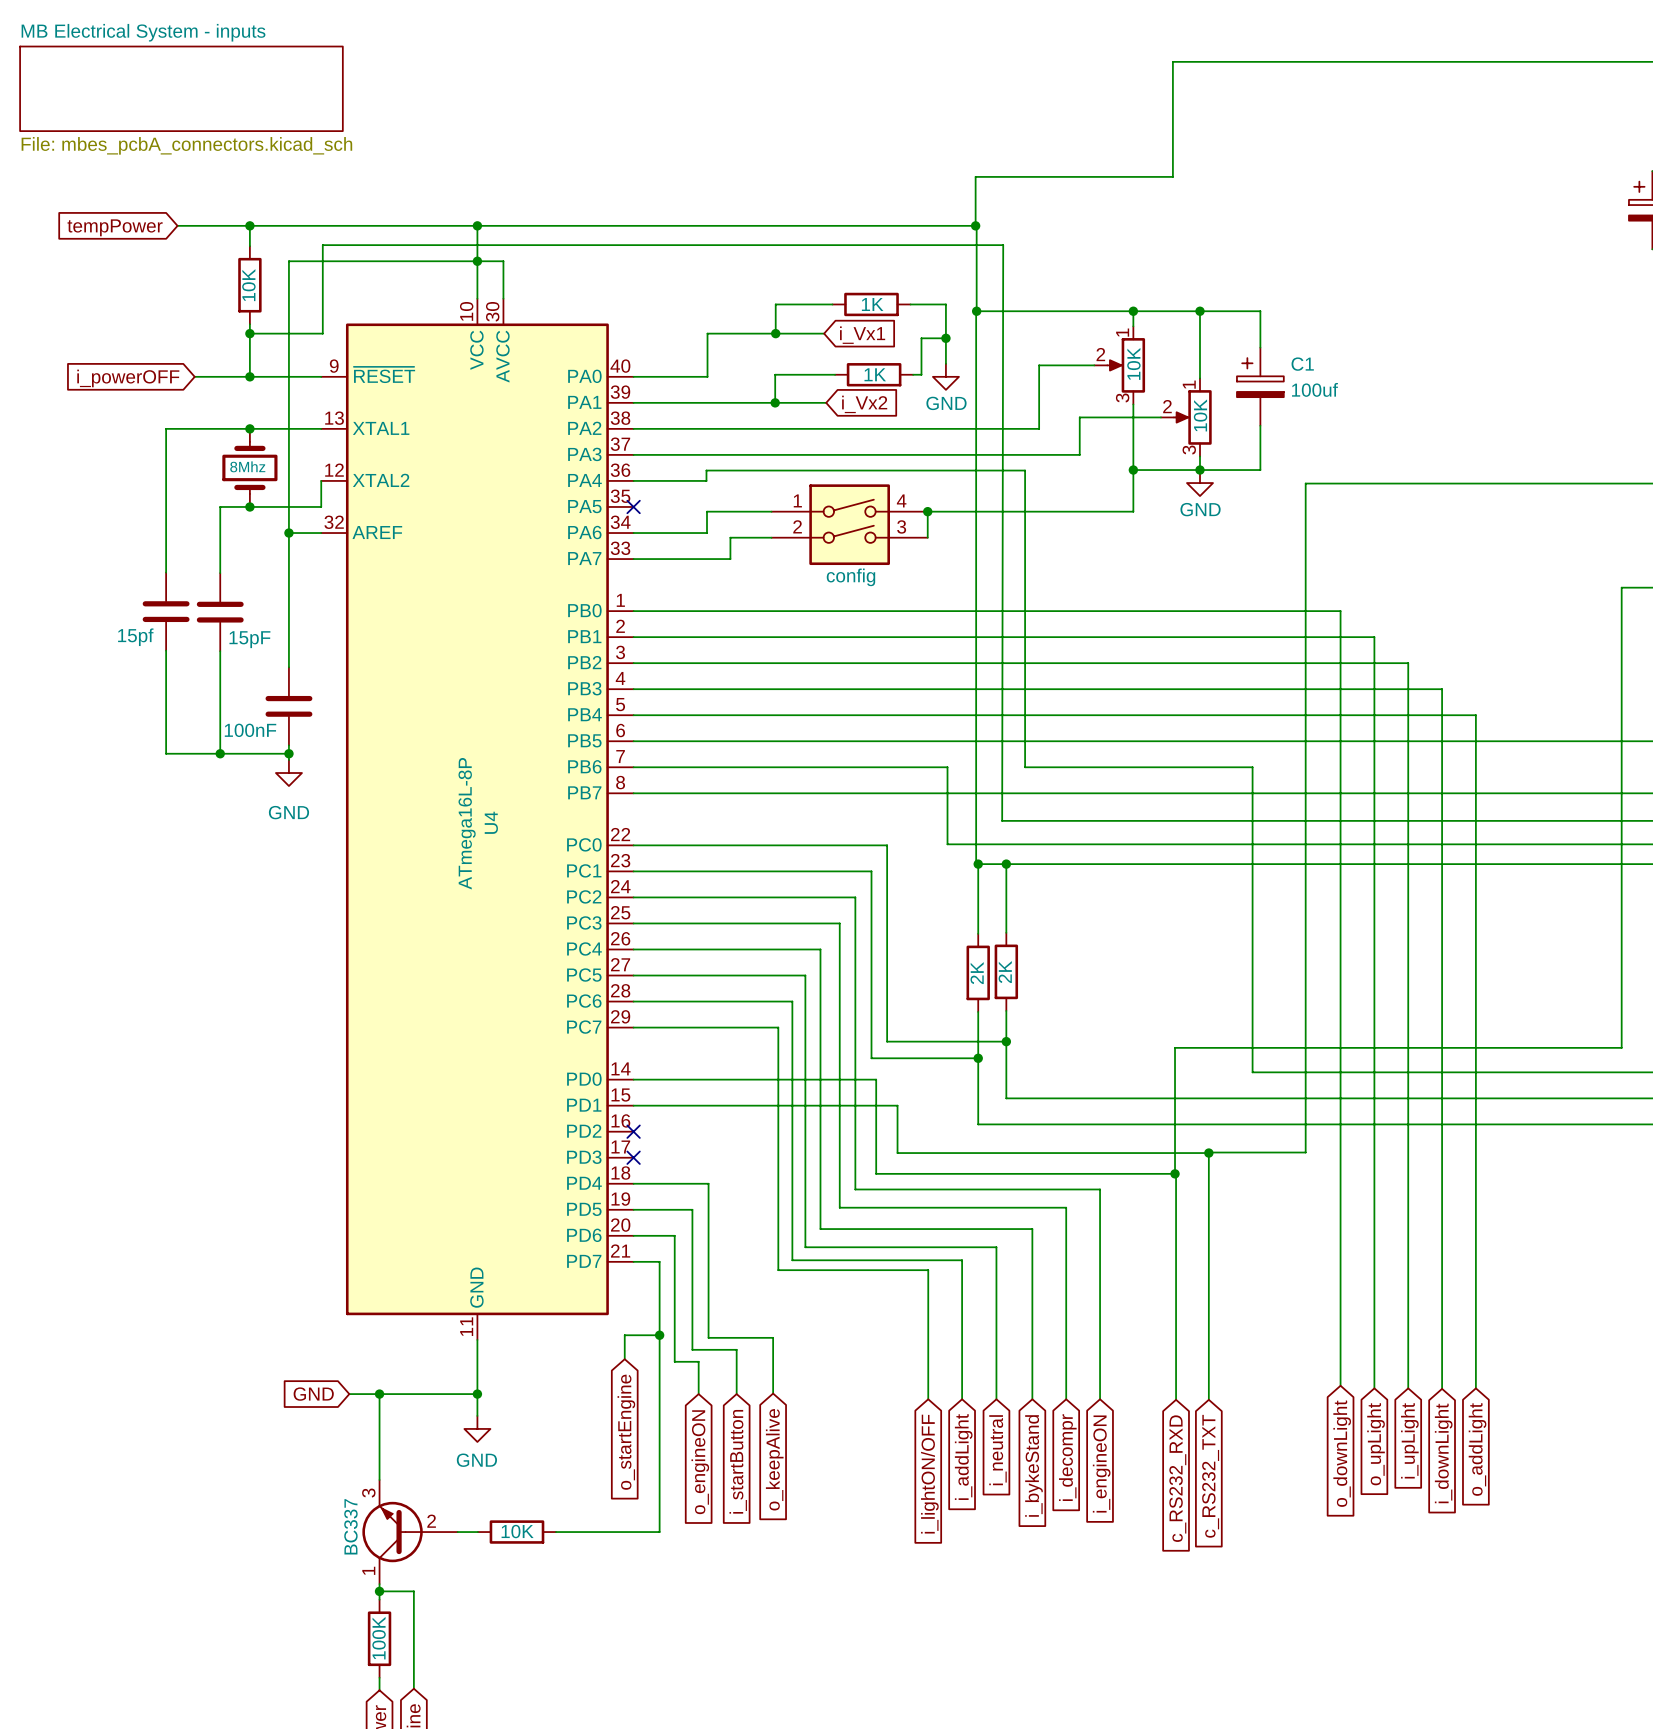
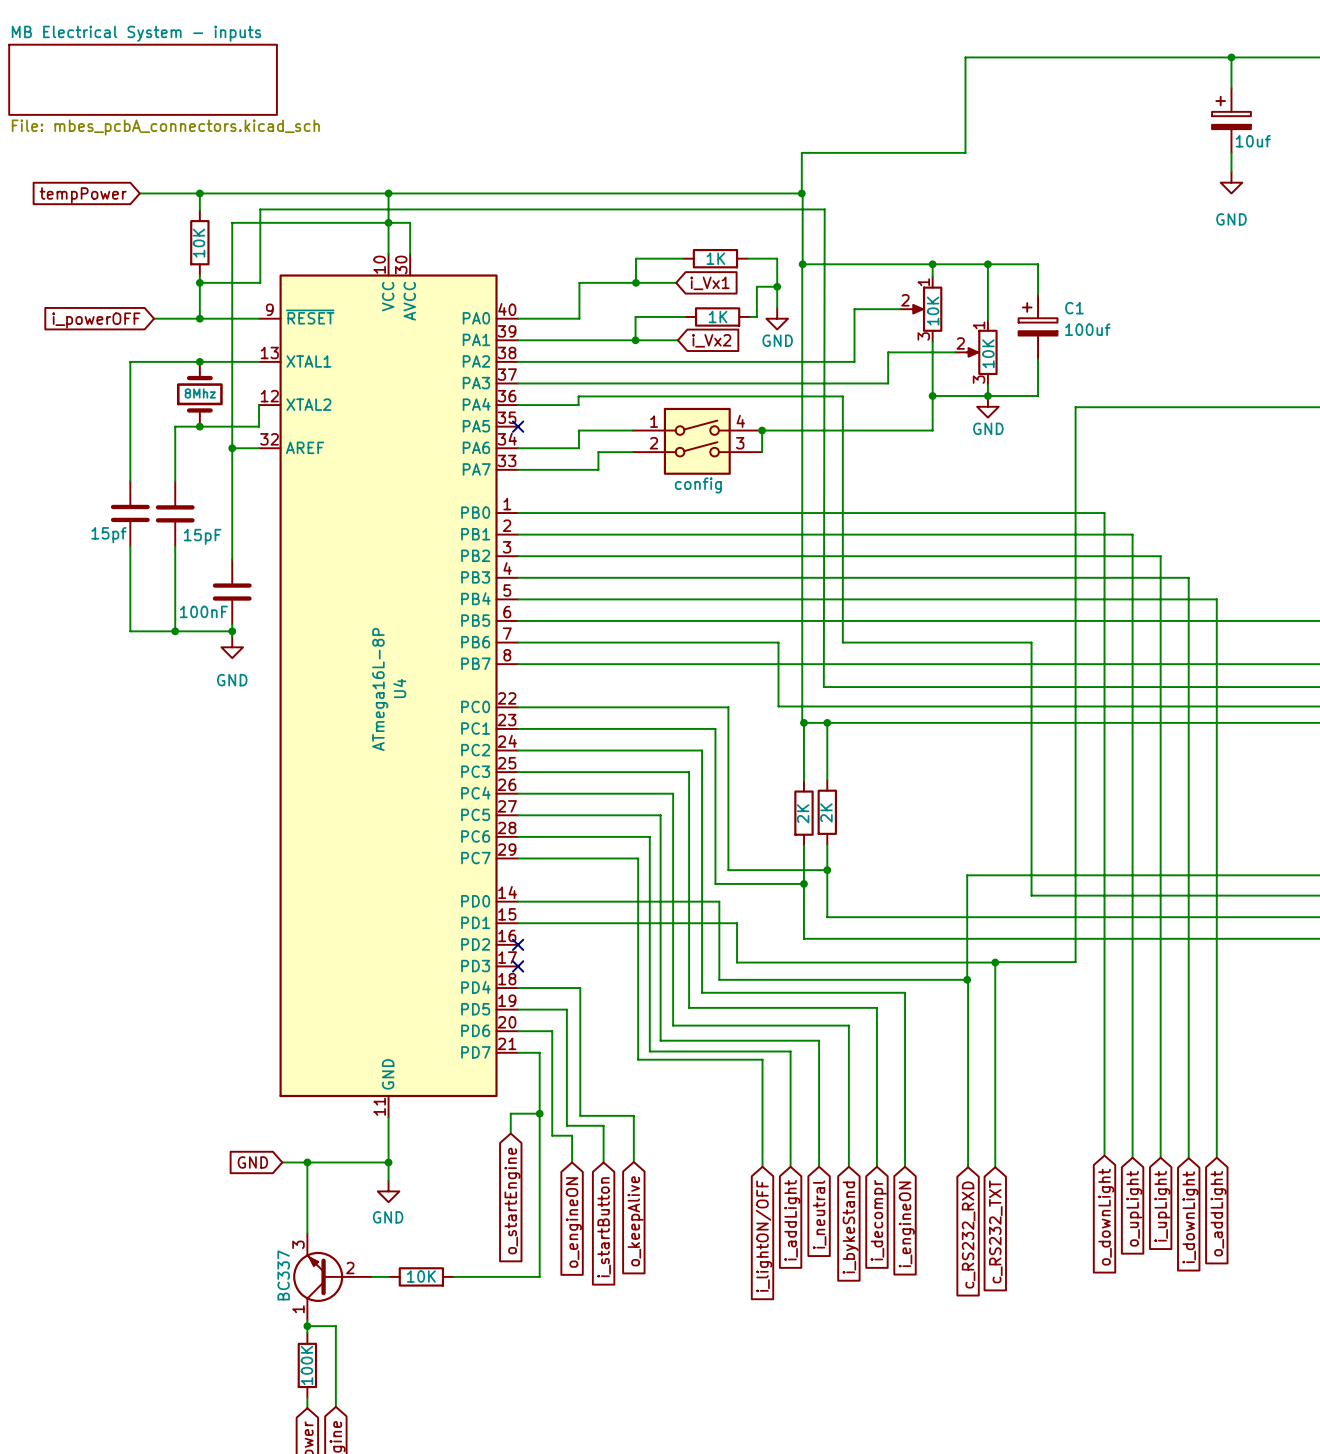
wire: none -> (1231, 57) (1231, 88)
junction: none -> (1231, 57)
part: none -> 10uf (1231, 120)
wire: none -> (1231, 152) (1231, 171)
power symbol: none -> GND (1231, 182)

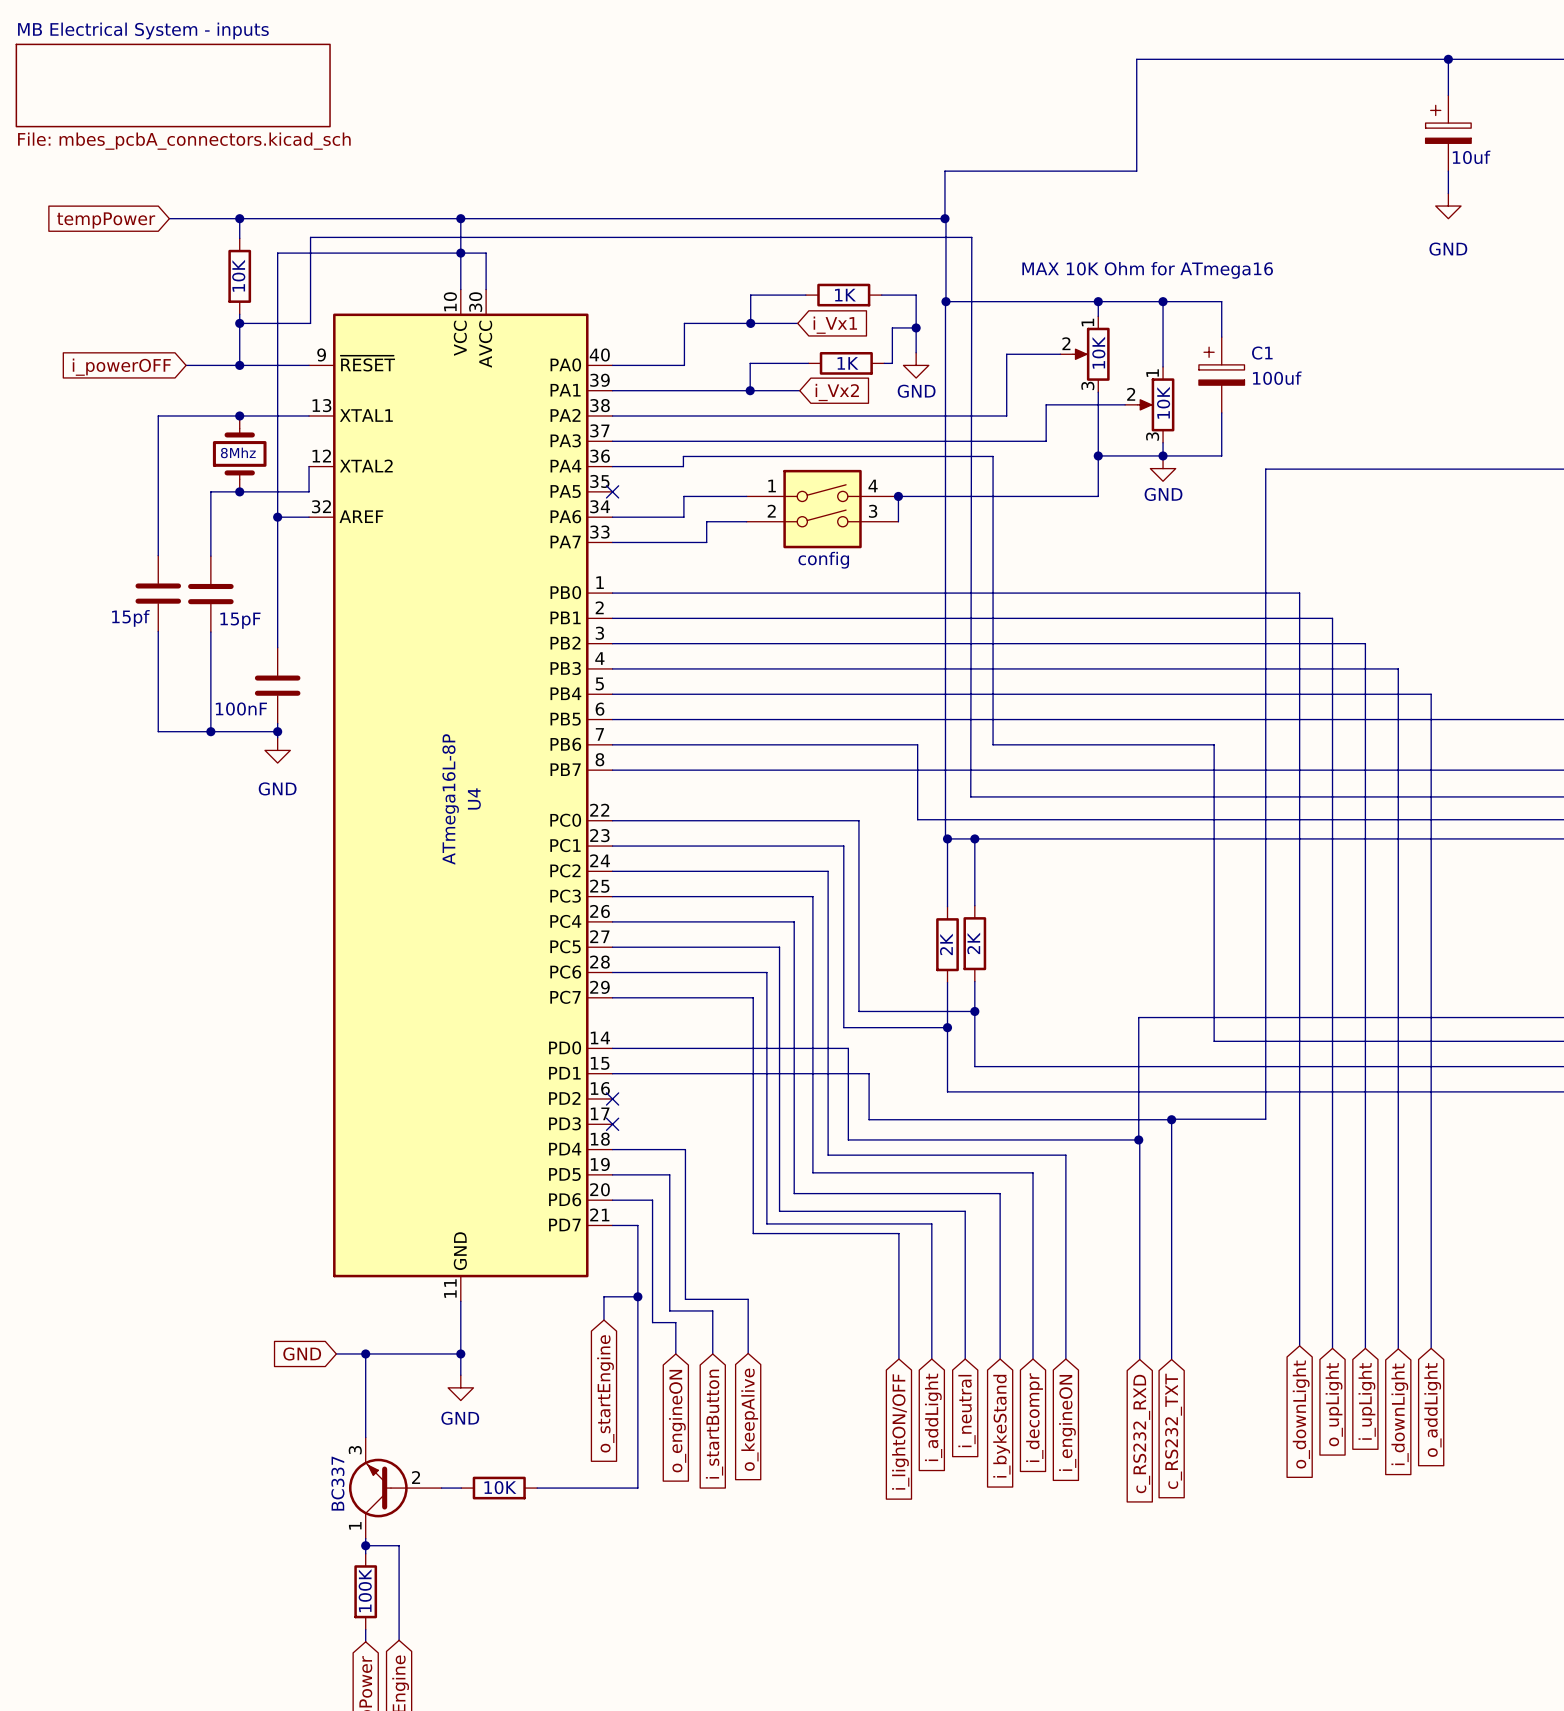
text: none -> MAX 10K Ohm for ATmega16 (1147, 270)

